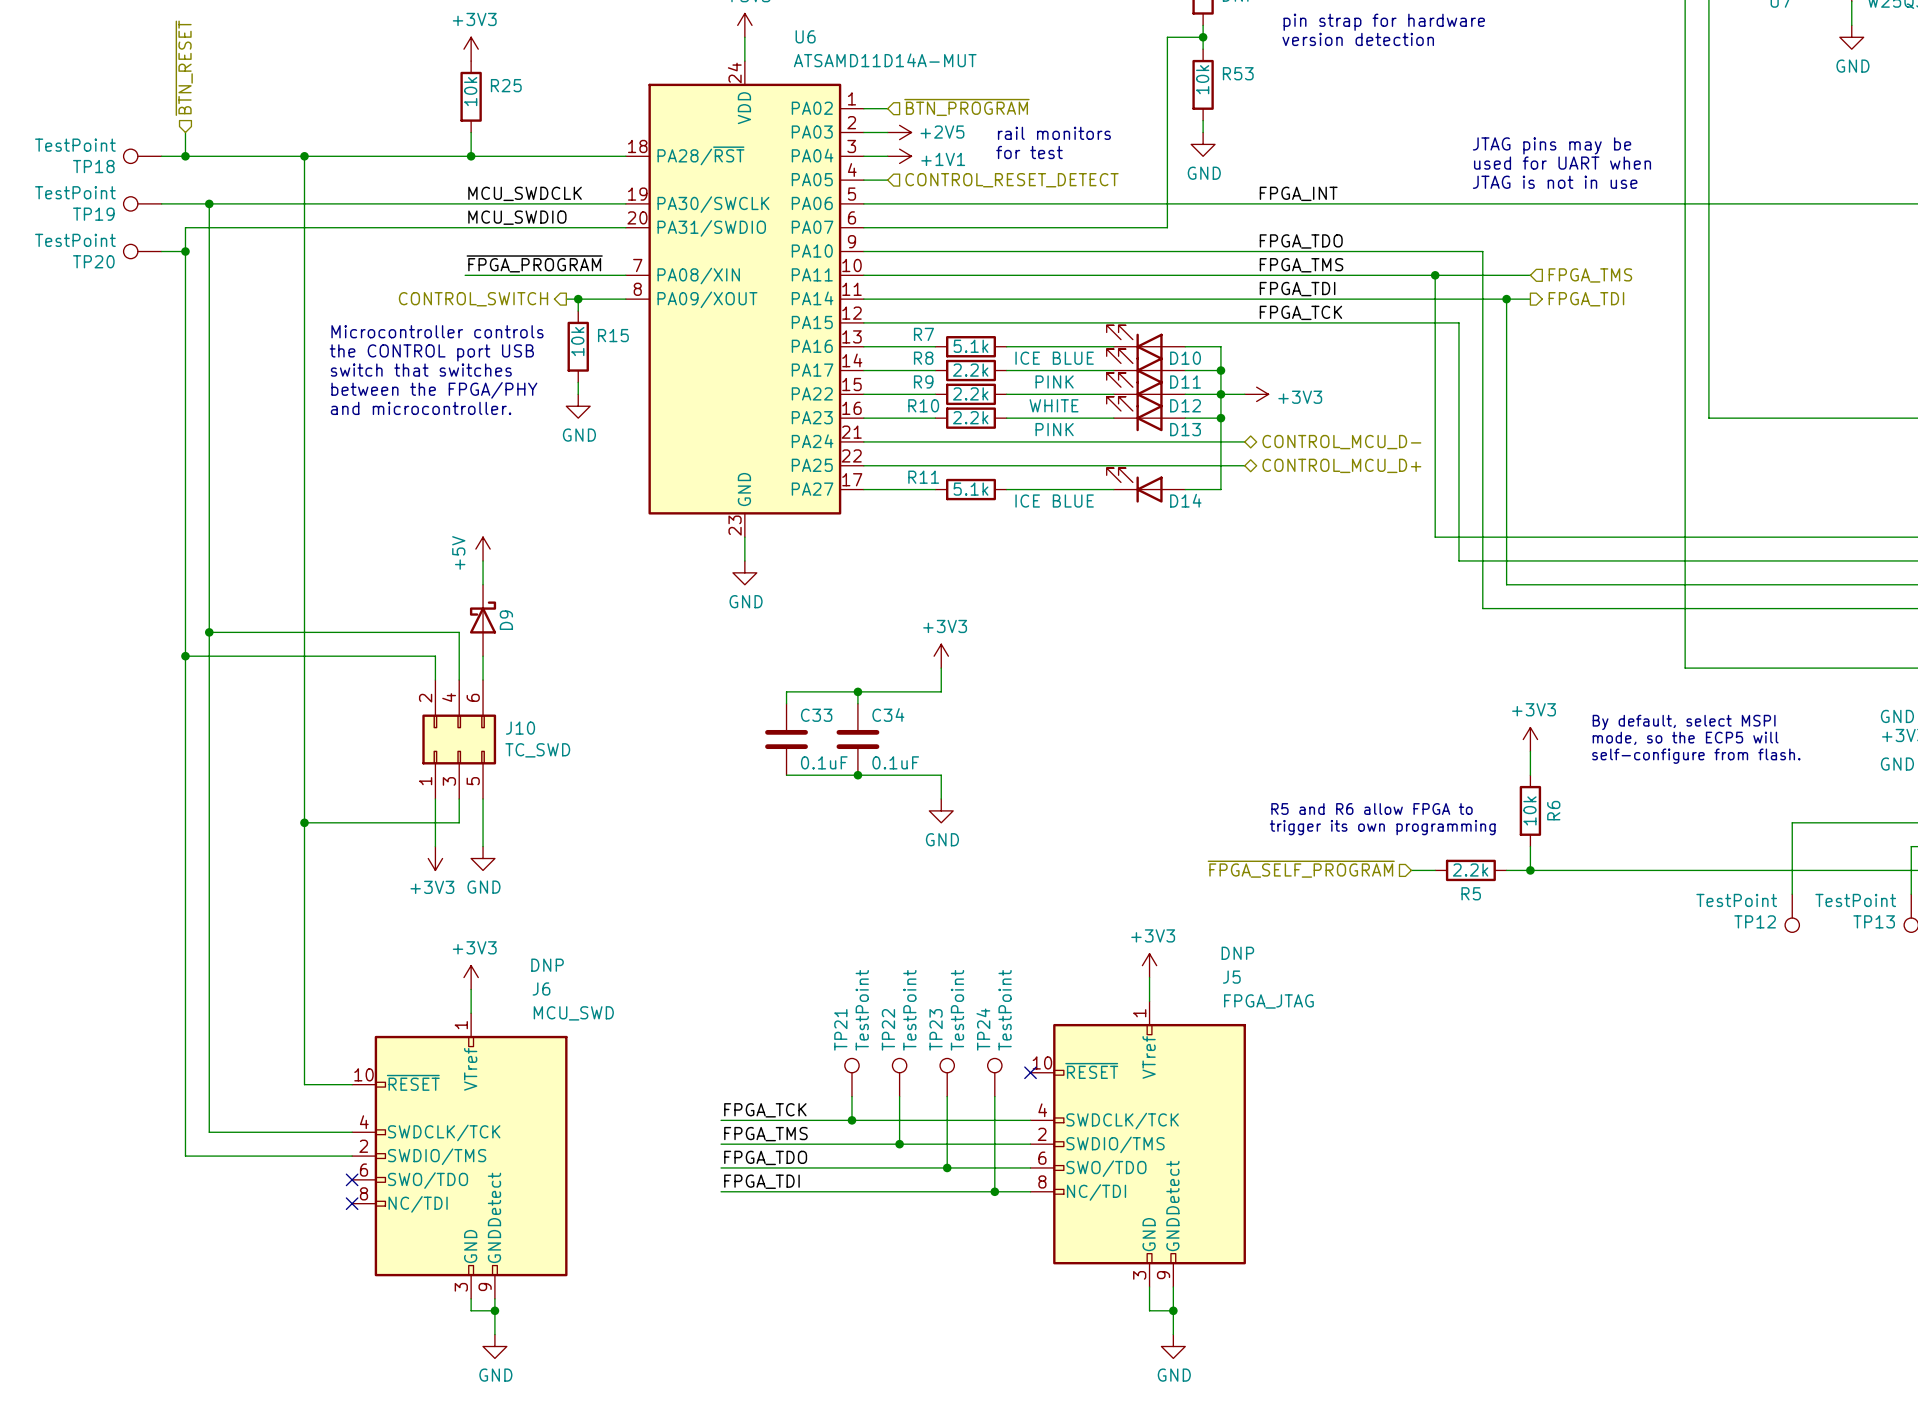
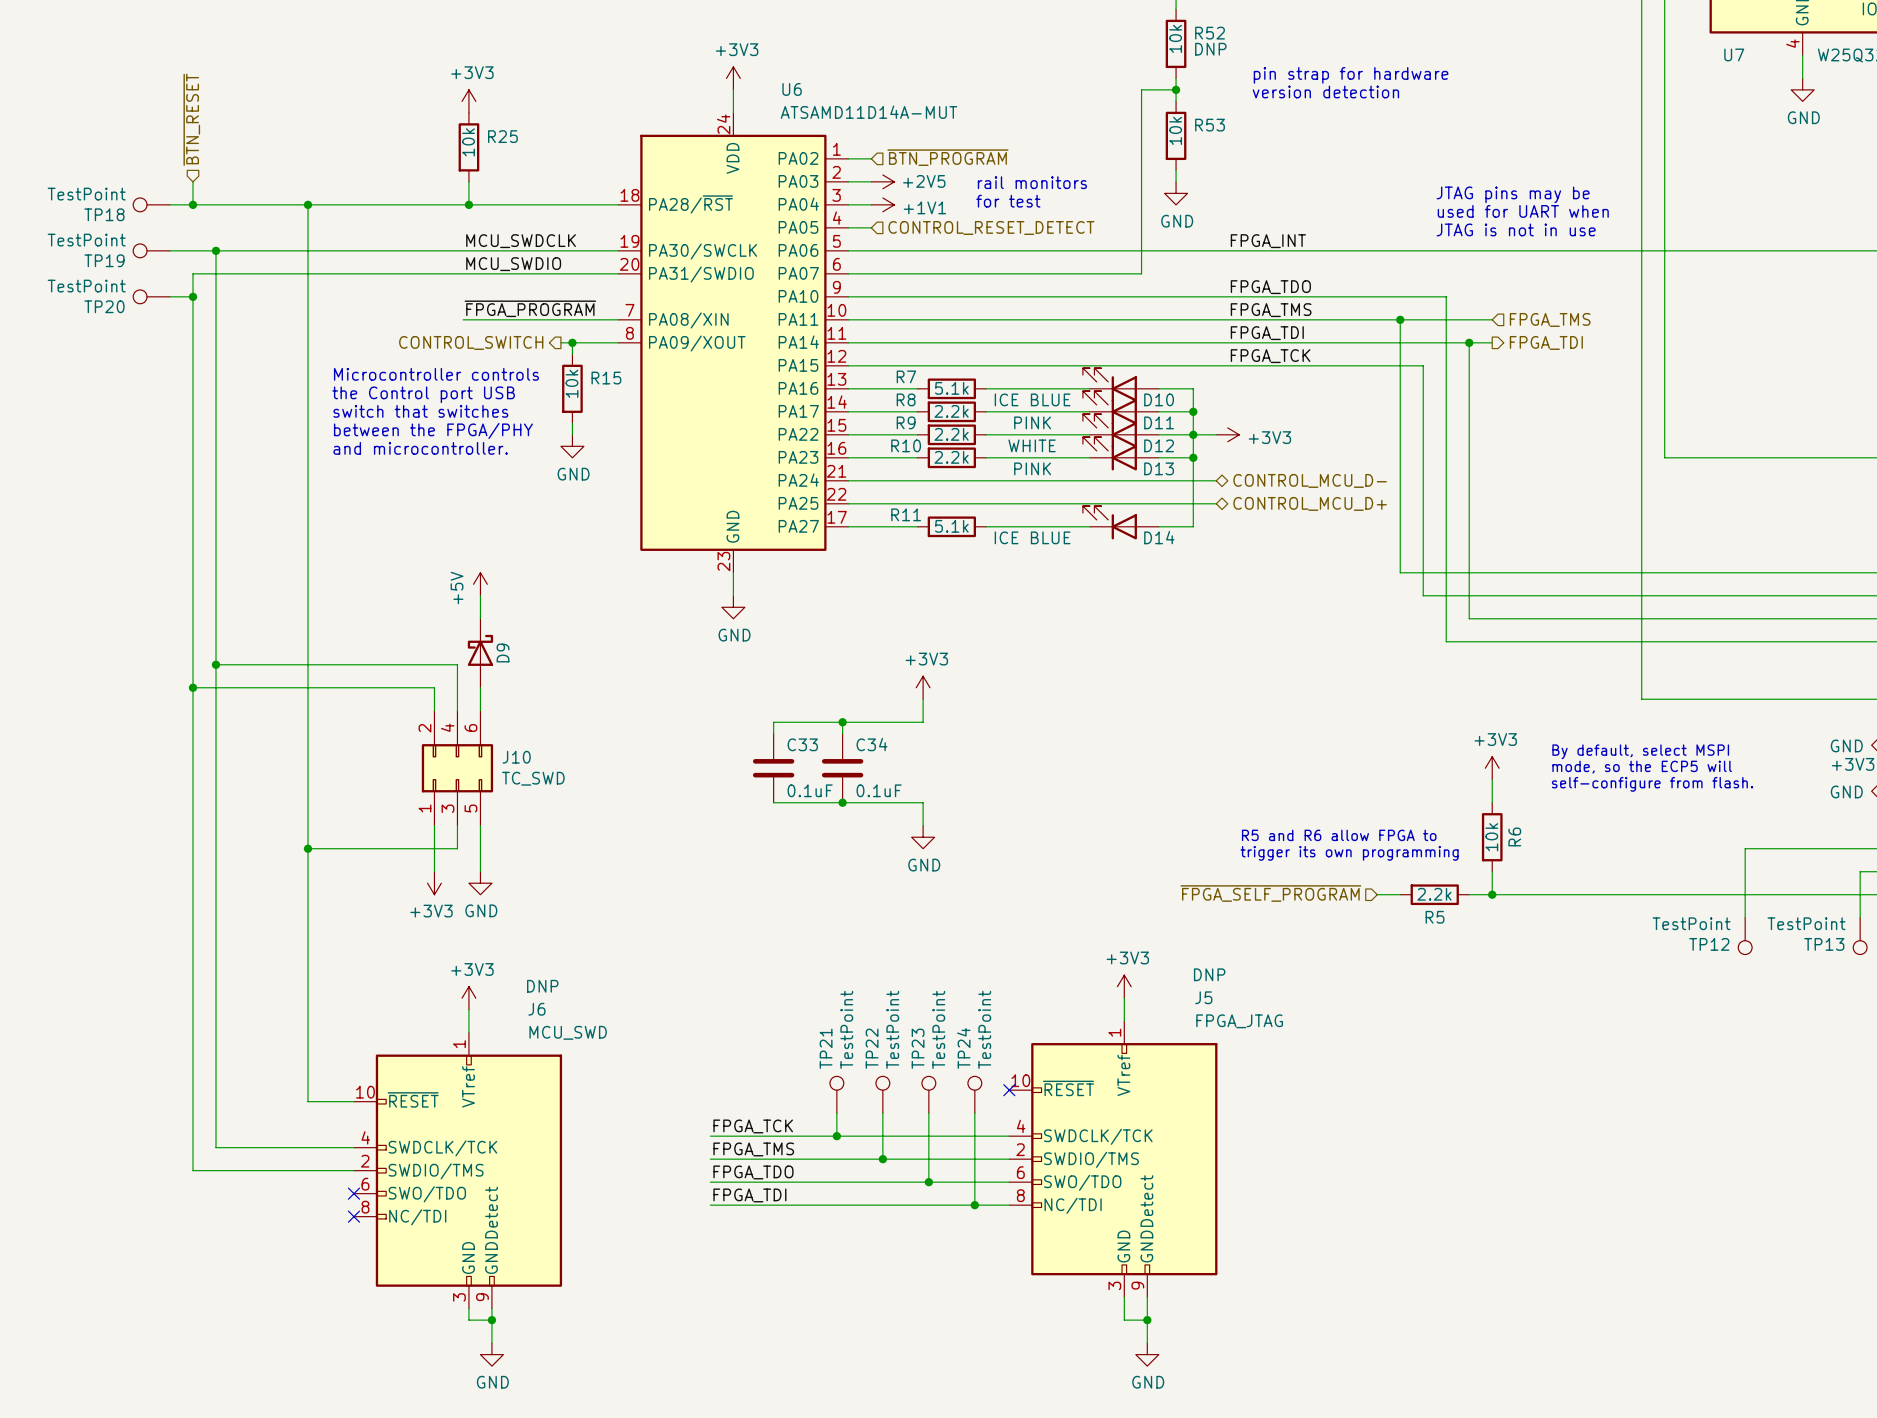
text: the CONTROL port USB (431, 352) -> the Control port USB (423, 394)

